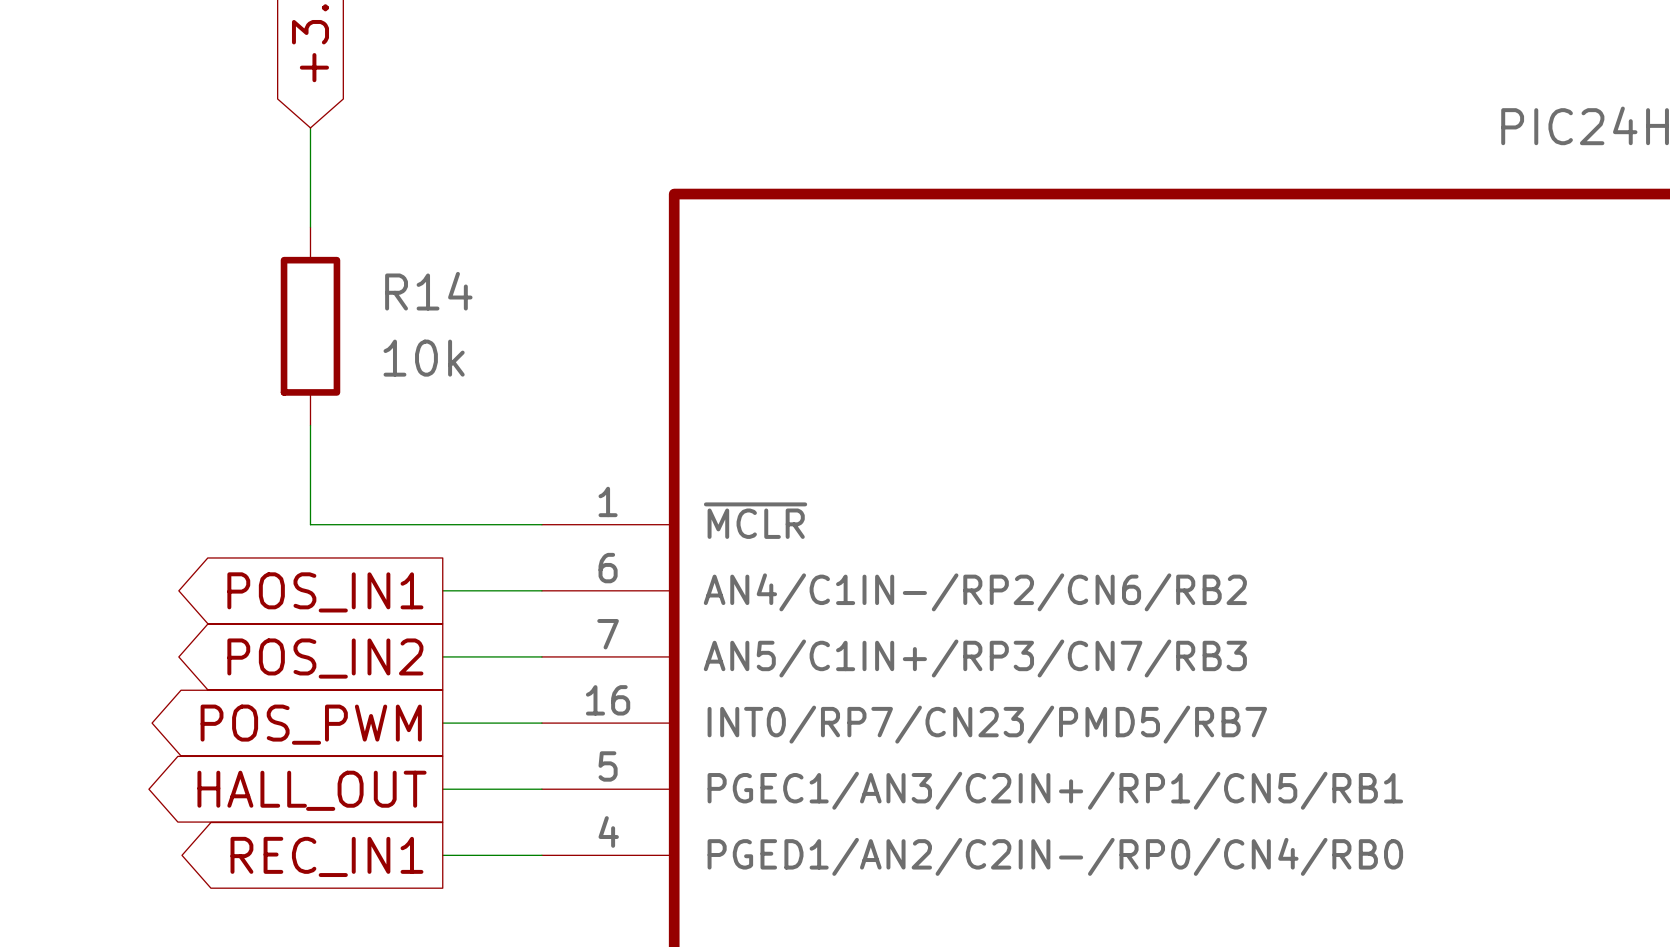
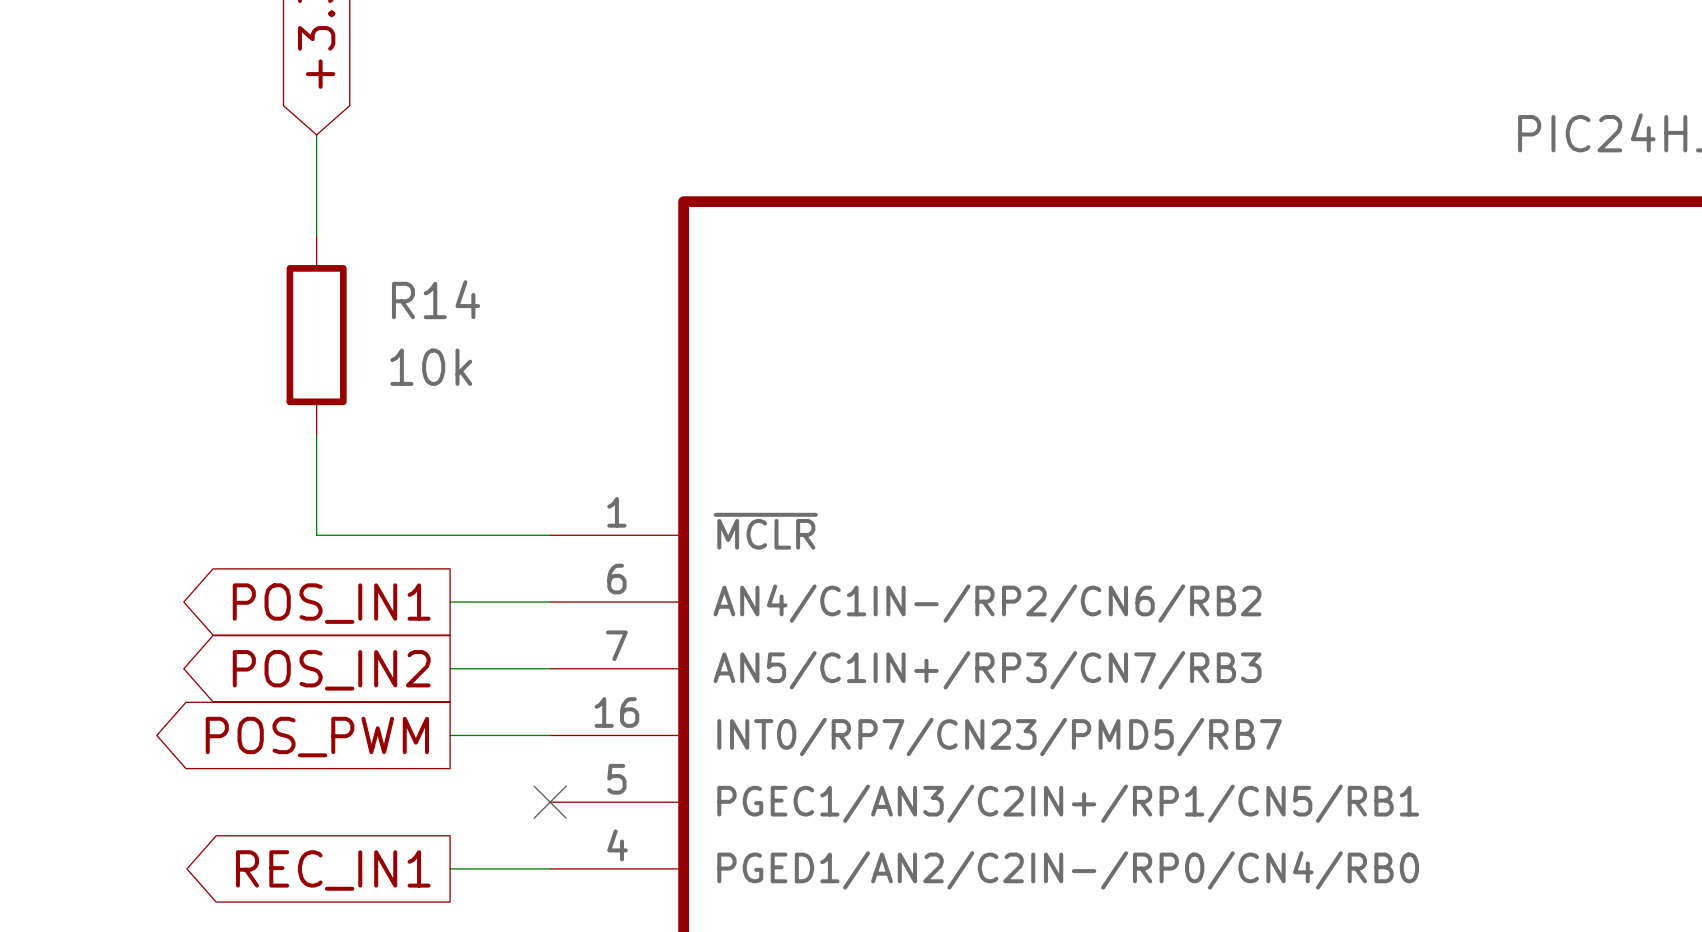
wire: (442, 789) (541, 789) -> none
no-connect mark: none -> (550, 802)
global label: HALL_OUT (312, 790) -> none

